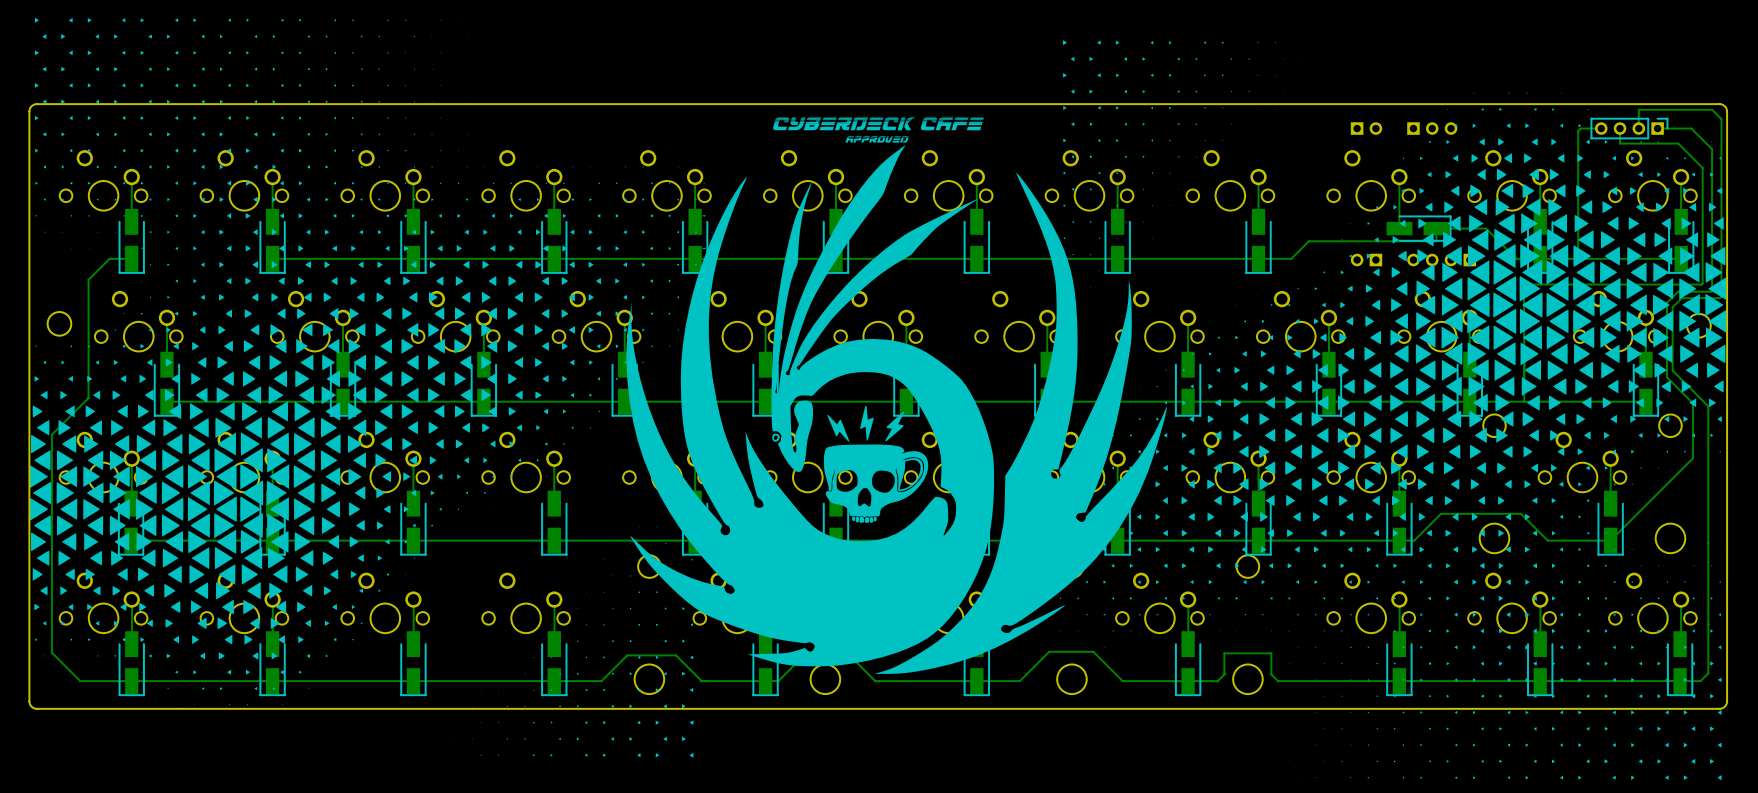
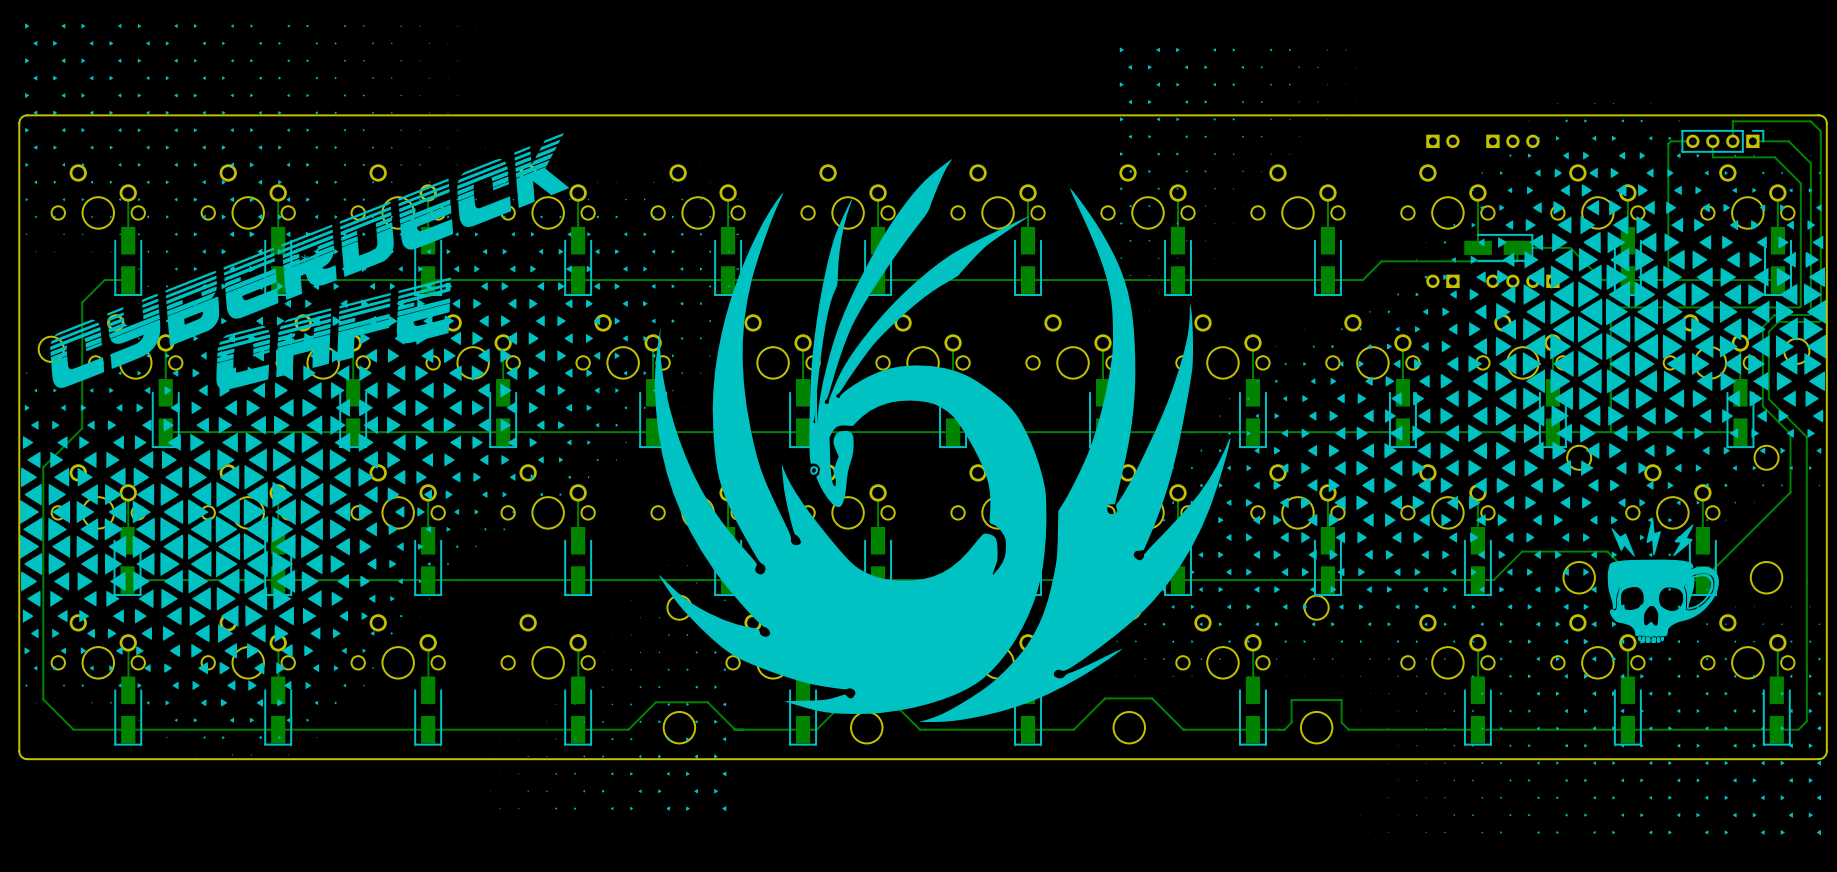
drawing: [773, 116, 985, 143] -> none
part: none -> (309, 261)
drawing: [823, 405, 929, 524] -> none
drawing: none -> [1607, 518, 1719, 644]

